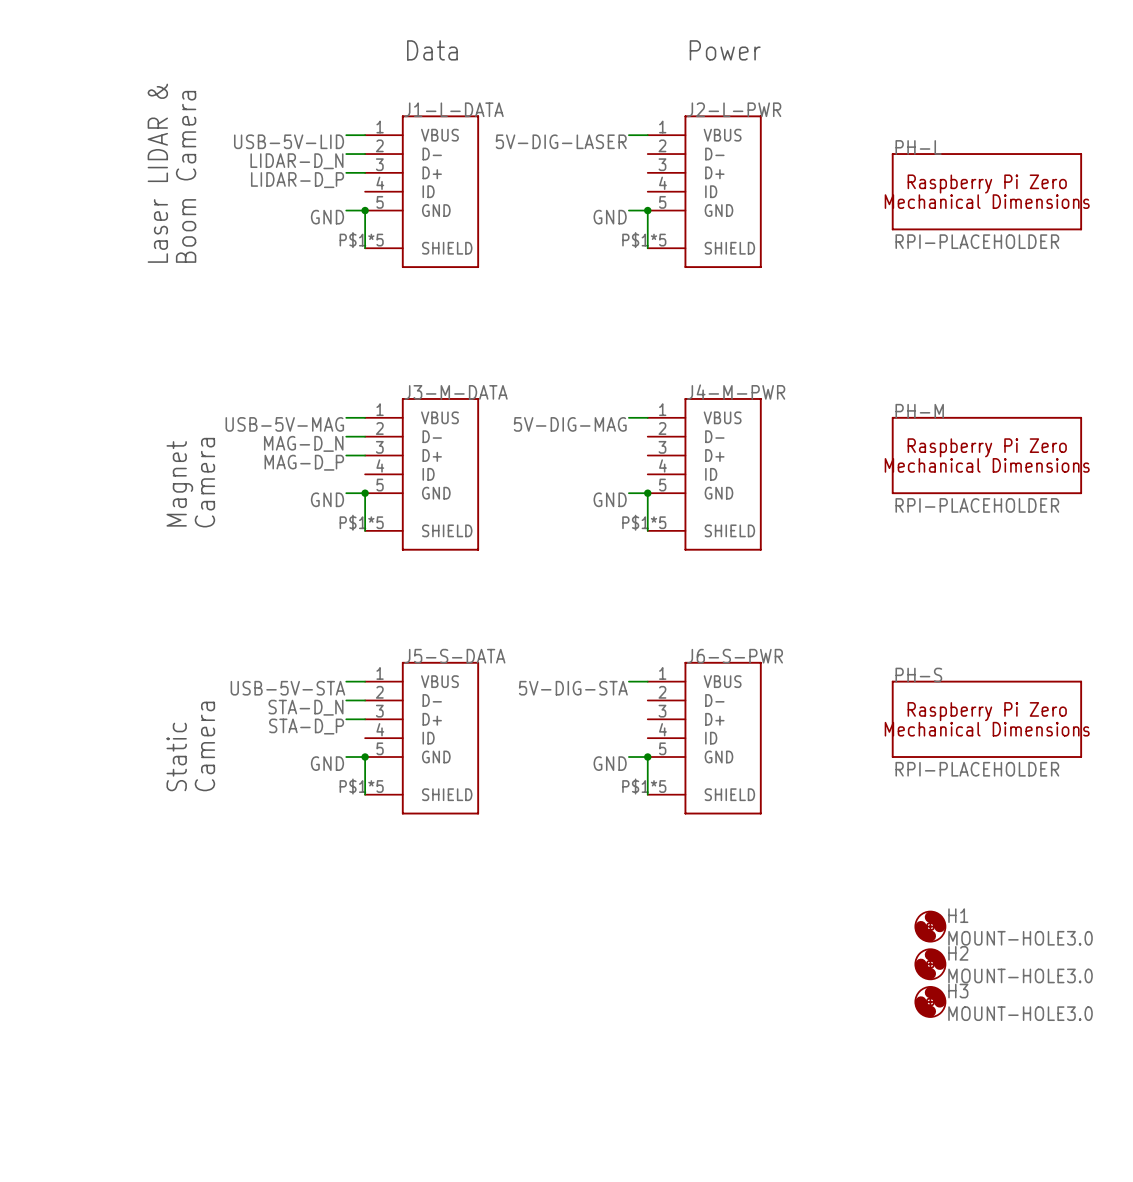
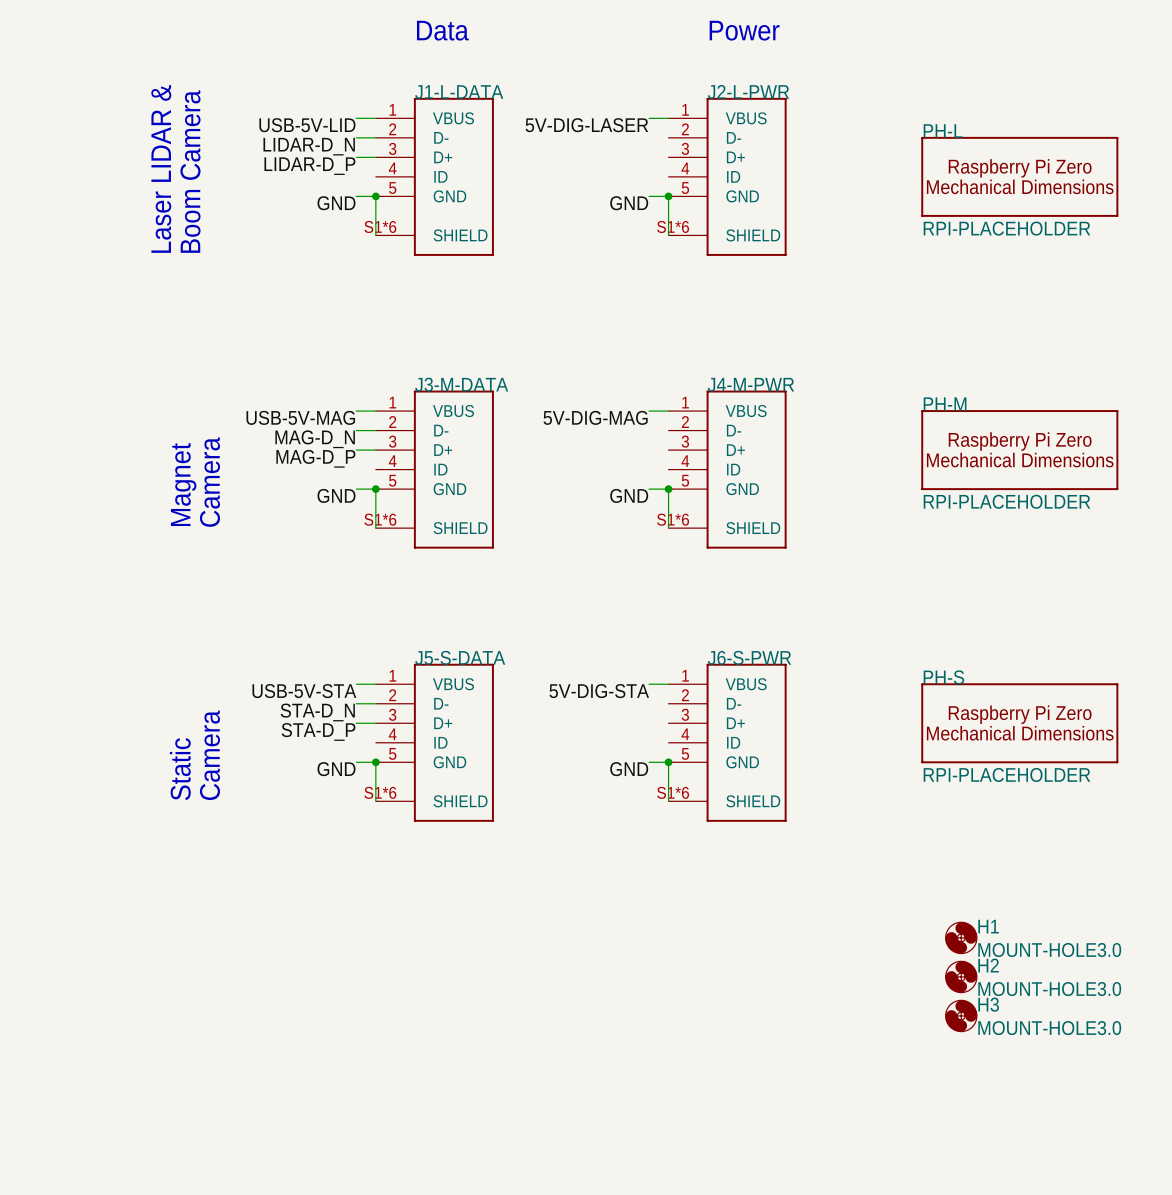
J1-L-DATA pin number: P$1*5 (361, 240) -> S1*6 (380, 226)
J2-L-PWR pin number: P$1*5 (644, 240) -> S1*6 (673, 226)
J3-M-DATA pin number: P$1*5 (361, 522) -> S1*6 (380, 519)
J4-M-PWR pin number: P$1*5 (644, 522) -> S1*6 (673, 519)
J5-S-DATA pin number: P$1*5 (361, 786) -> S1*6 (380, 792)
J6-S-PWR pin number: P$1*5 (644, 786) -> S1*6 (673, 792)

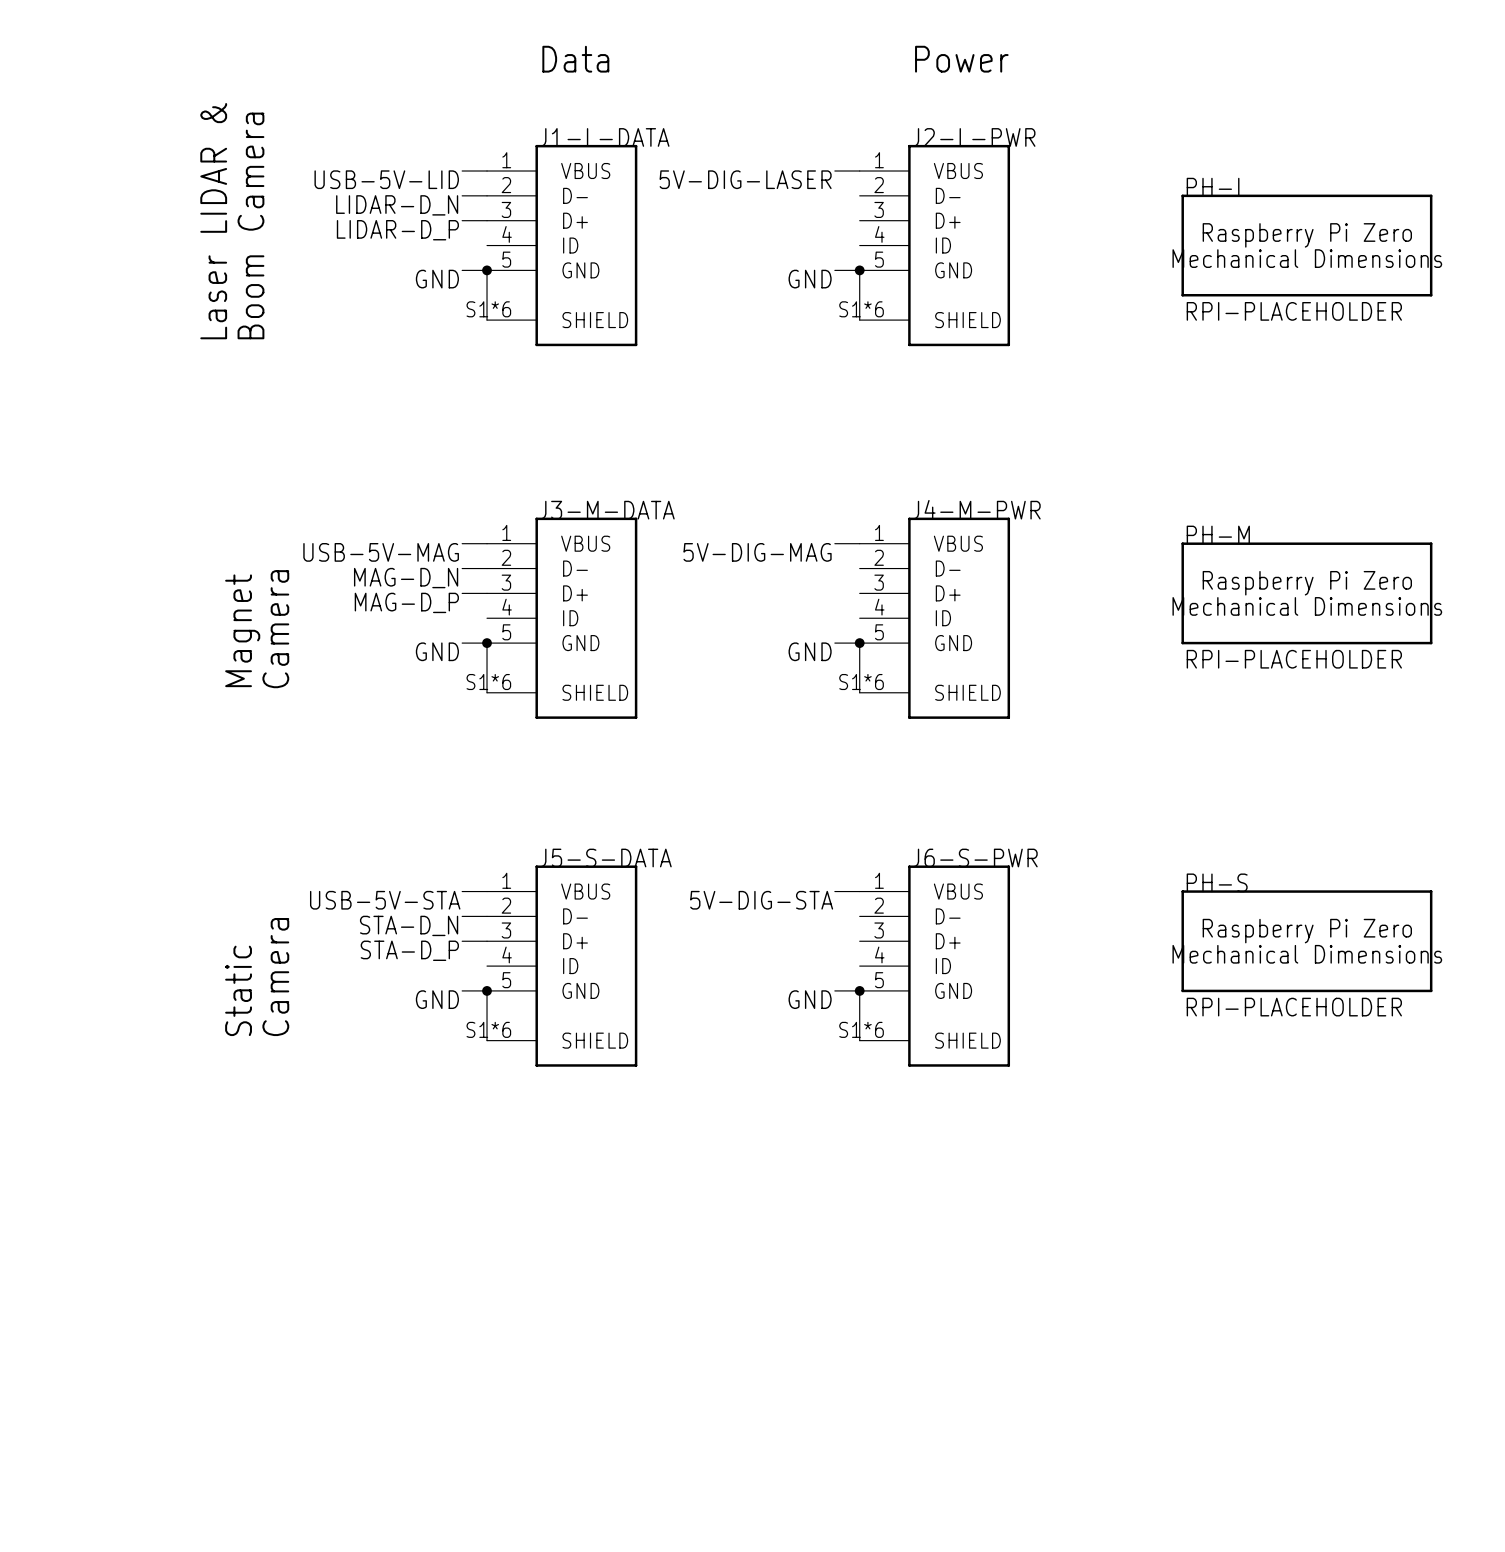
H1: MOUNT-HOLE3.0 (961, 937) -> none
H2: MOUNT-HOLE3.0 (961, 976) -> none
H3: MOUNT-HOLE3.0 (961, 1015) -> none

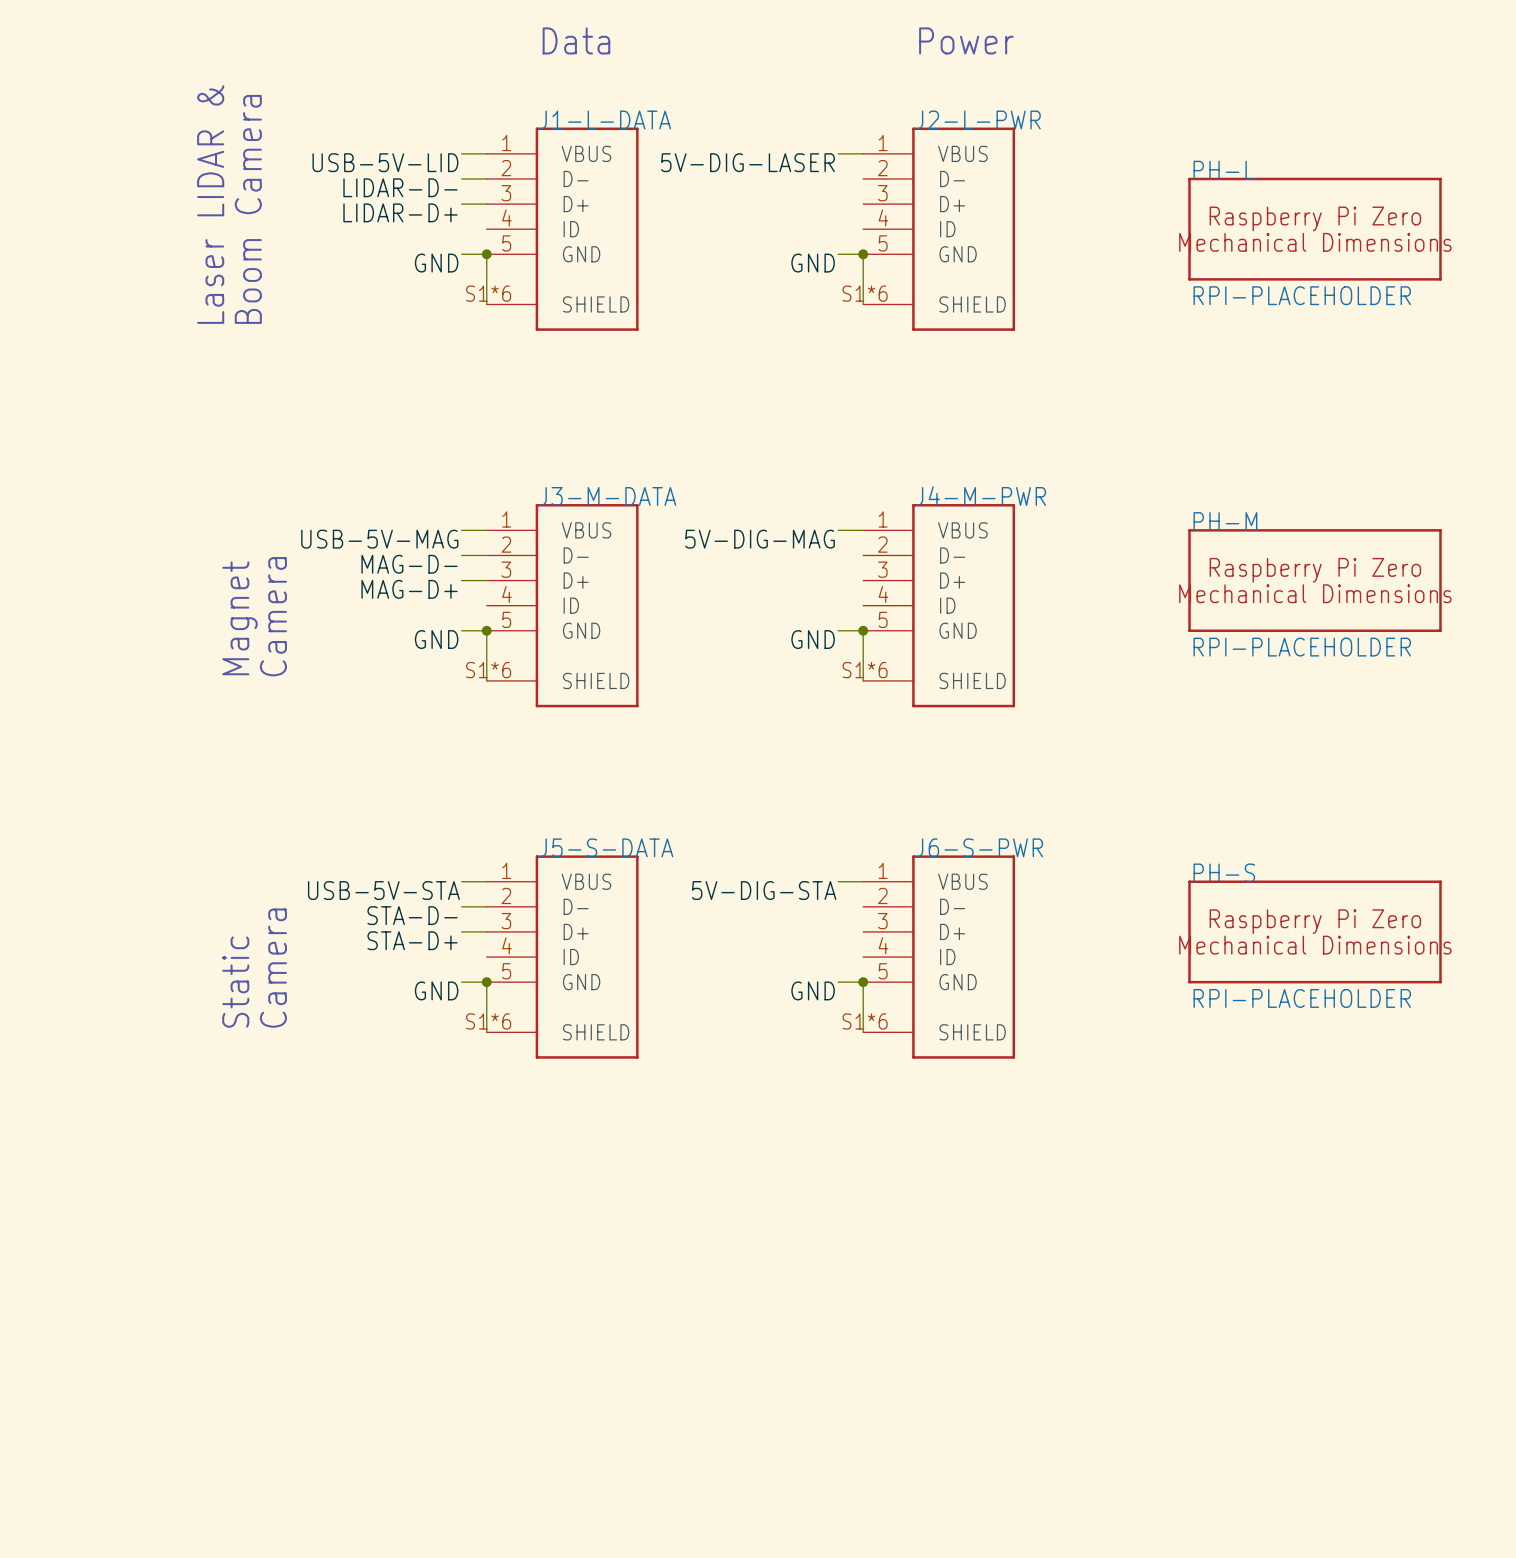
label: LIDAR-D_N (397, 205) -> LIDAR-D- (400, 187)
label: LIDAR-D_P (397, 230) -> LIDAR-D+ (400, 212)
label: MAG-D_N (406, 578) -> MAG-D- (409, 564)
label: MAG-D_P (406, 602) -> MAG-D+ (409, 589)
label: STA-D_N (409, 925) -> STA-D- (412, 915)
label: STA-D_P (409, 950) -> STA-D+ (412, 940)

